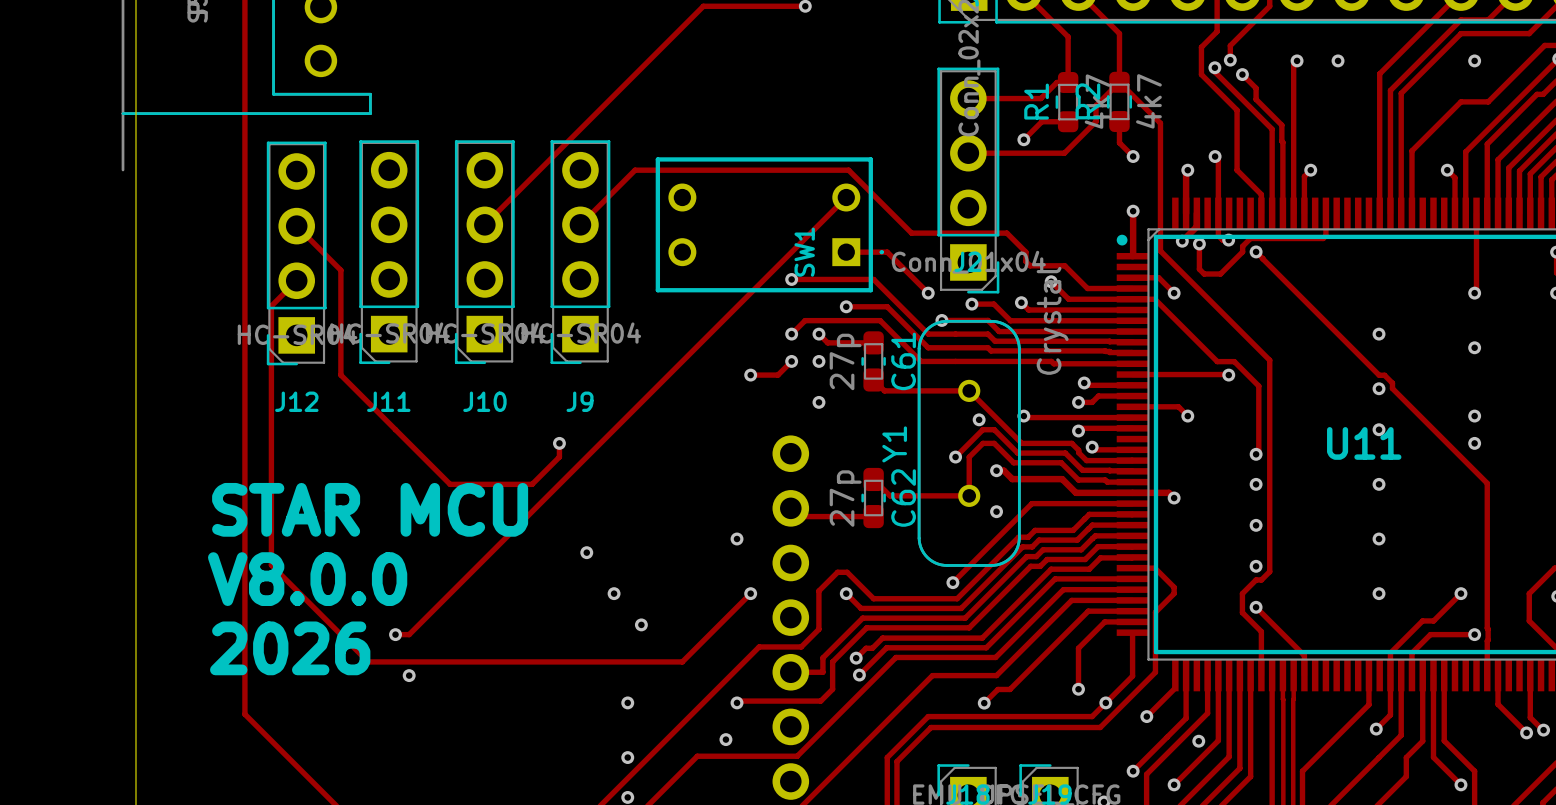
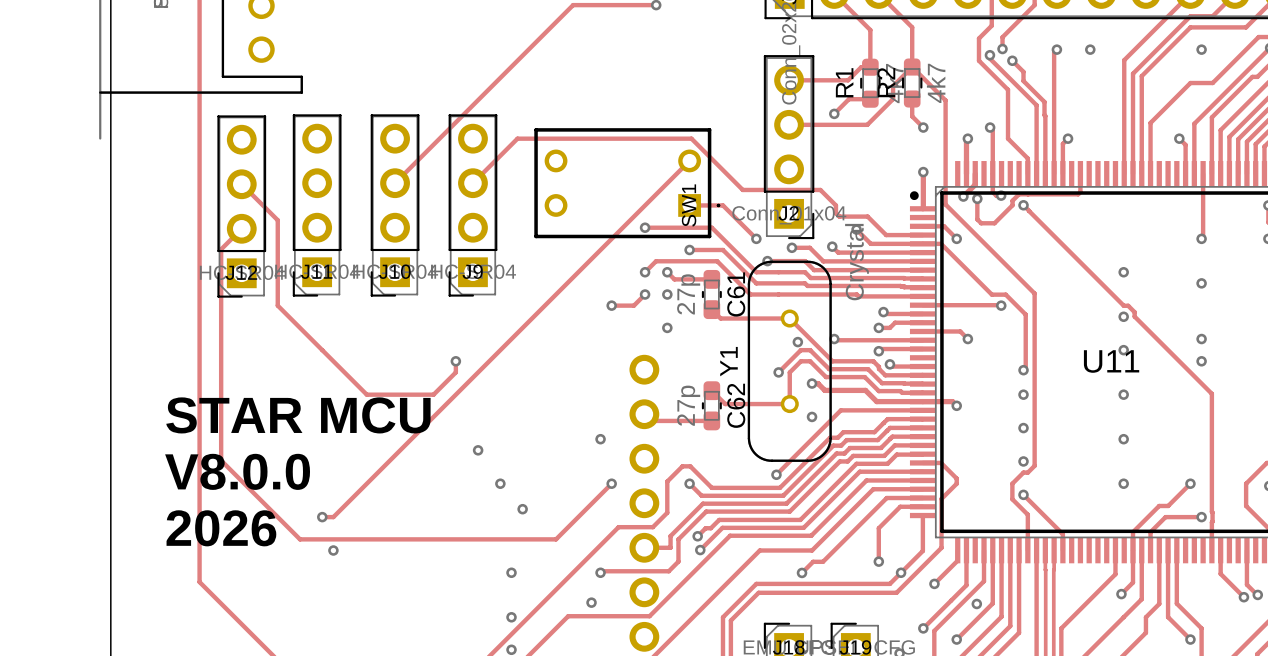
SW1 name position: SW1 (804, 252) -> SW1 (689, 205)
J12 name position: J12 (296, 401) -> J12 (241, 272)
J11 name position: J11 (388, 401) -> J11 (316, 271)
J10 name position: J10 (484, 401) -> J10 (394, 271)
J9 name position: J9 (580, 401) -> J9 (472, 271)

